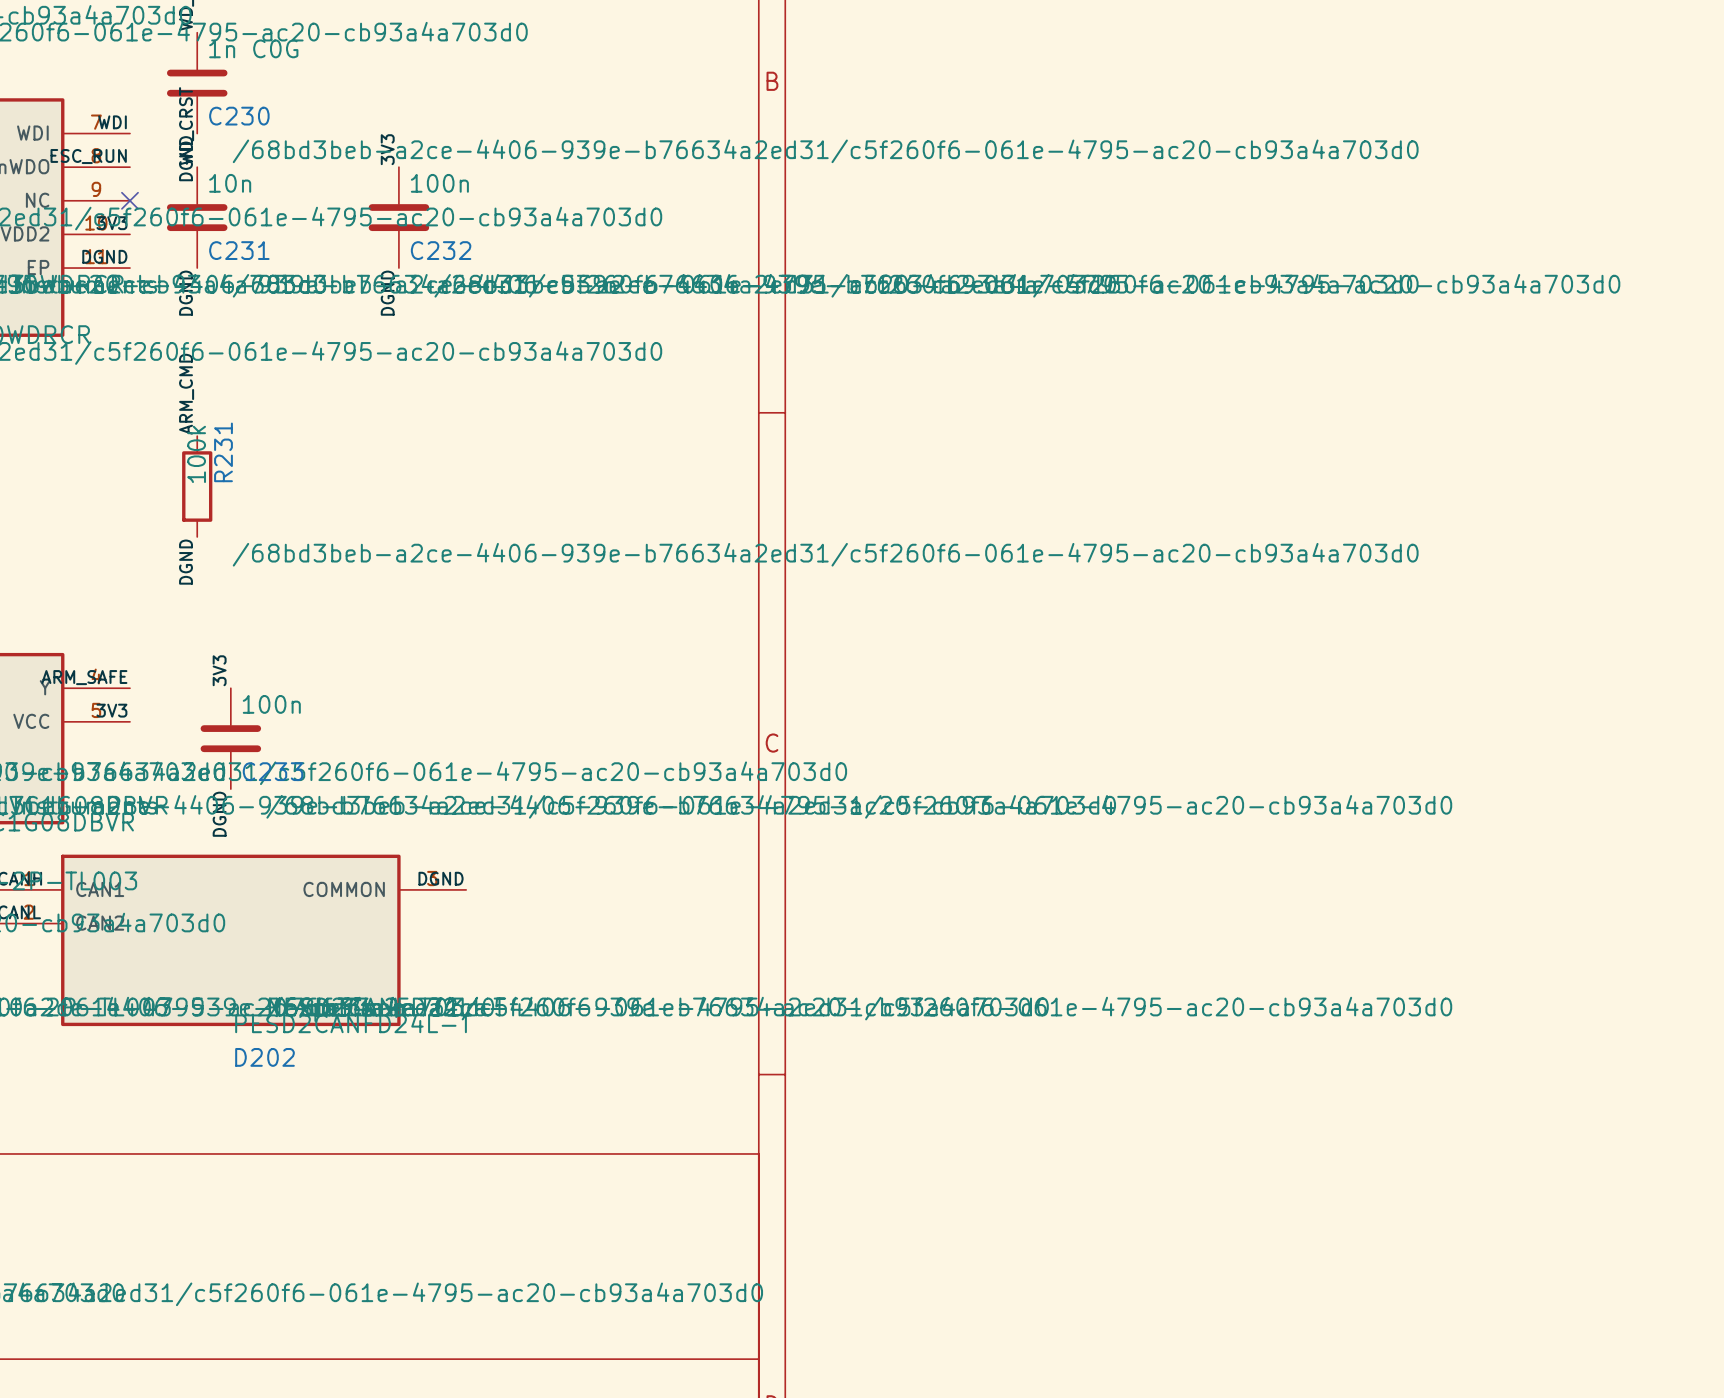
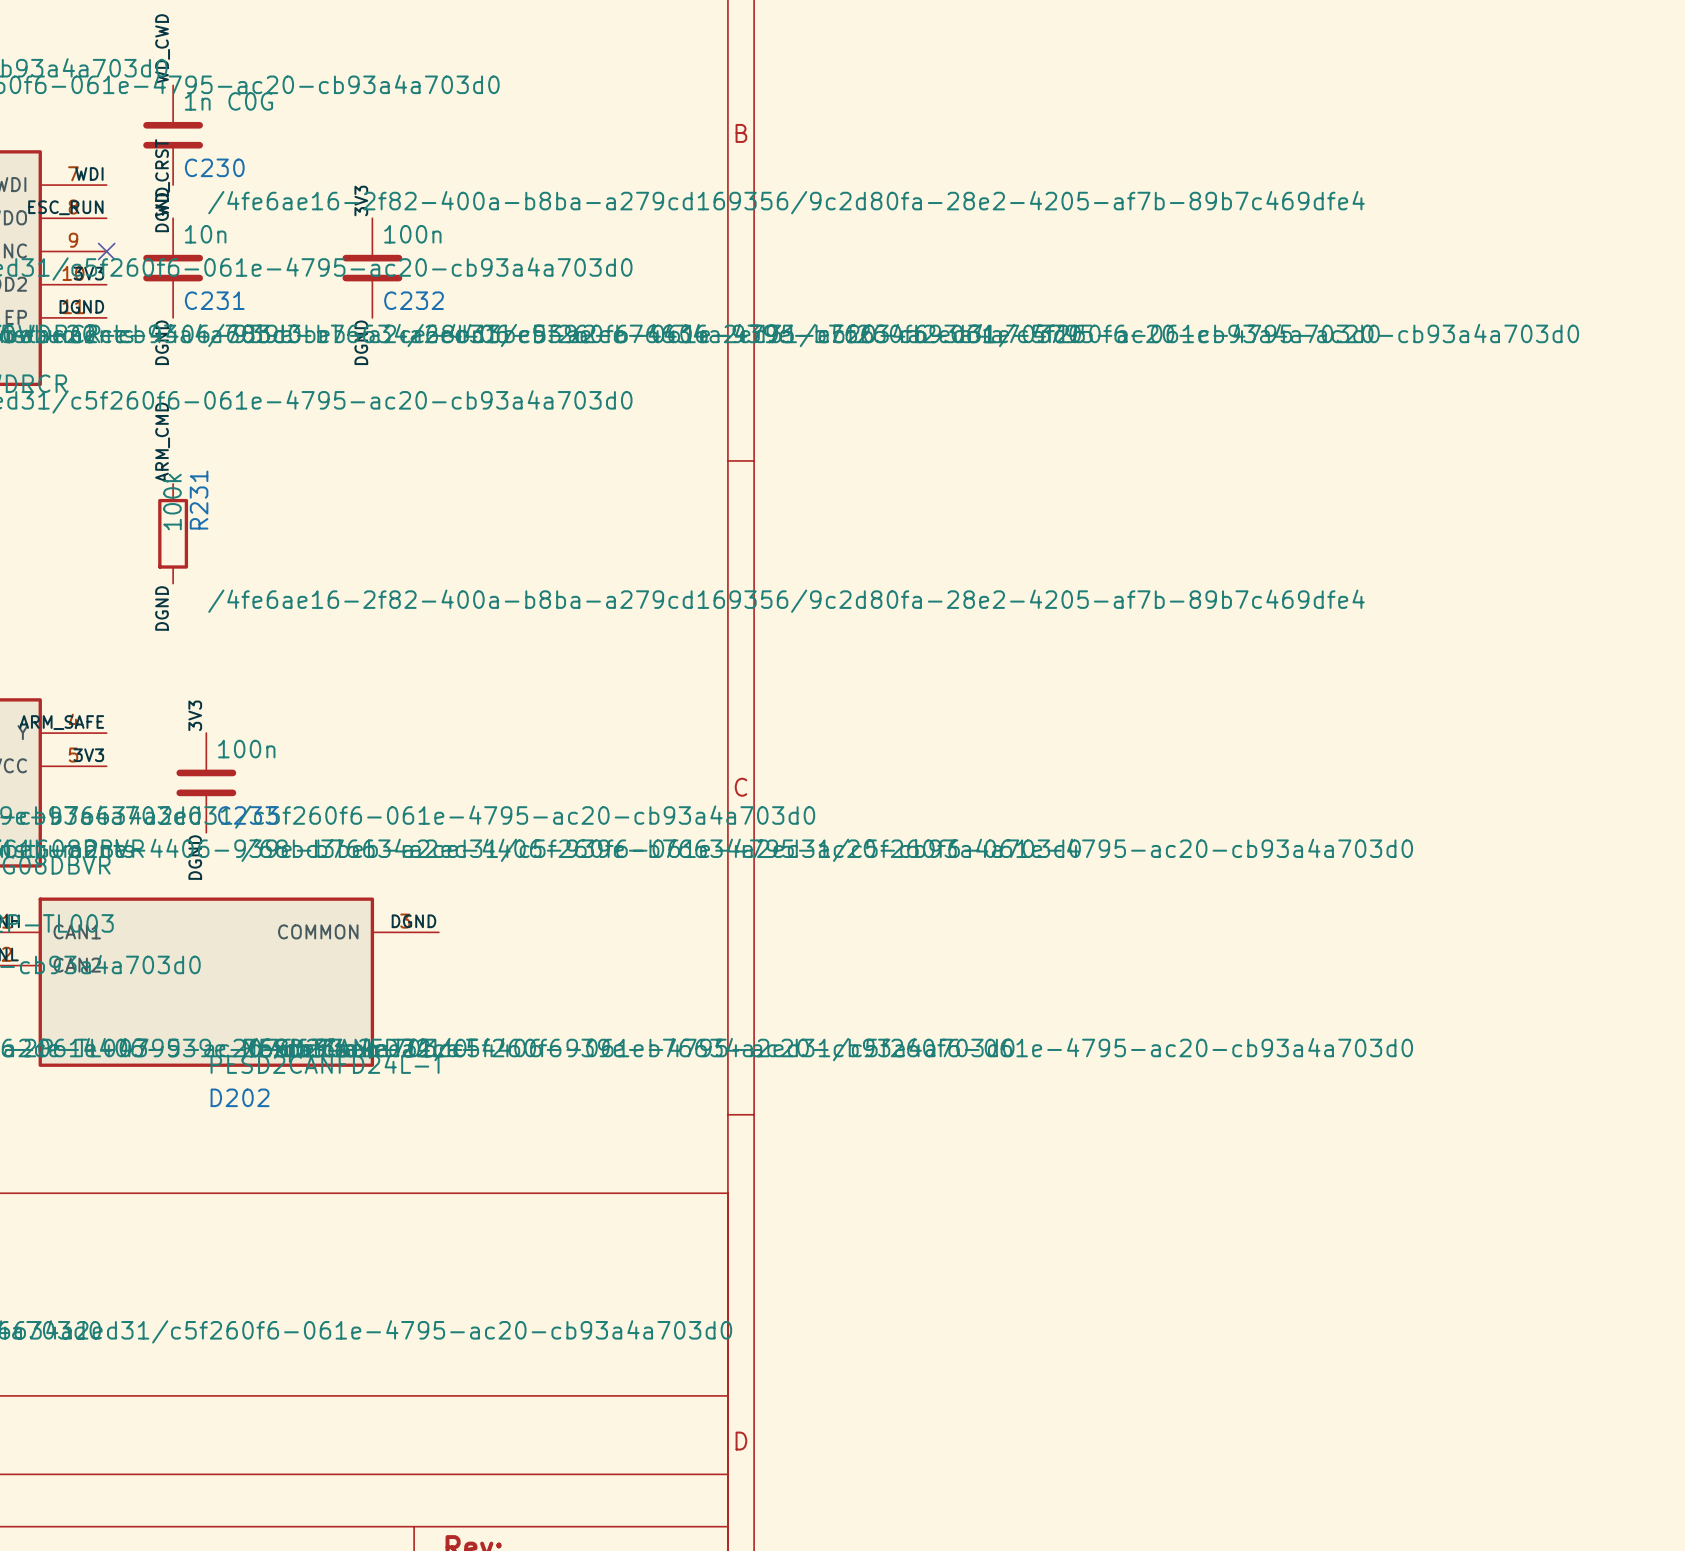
C230 text: /68bd3beb-a2ce-4406-939e-b76634a2ed31/c5f260f6-061e-4795-ac20-cb93a4a703d0 (825, 151) -> /4fe6ae16-2f82-400a-b8ba-a279cd169356/9c2d80fa-28e2-4205-af7b-89b7c469dfe4 (786, 202)
R231 text: /68bd3beb-a2ce-4406-939e-b76634a2ed31/c5f260f6-061e-4795-ac20-cb93a4a703d0 (825, 554) -> /4fe6ae16-2f82-400a-b8ba-a279cd169356/9c2d80fa-28e2-4205-af7b-89b7c469dfe4 (786, 601)

